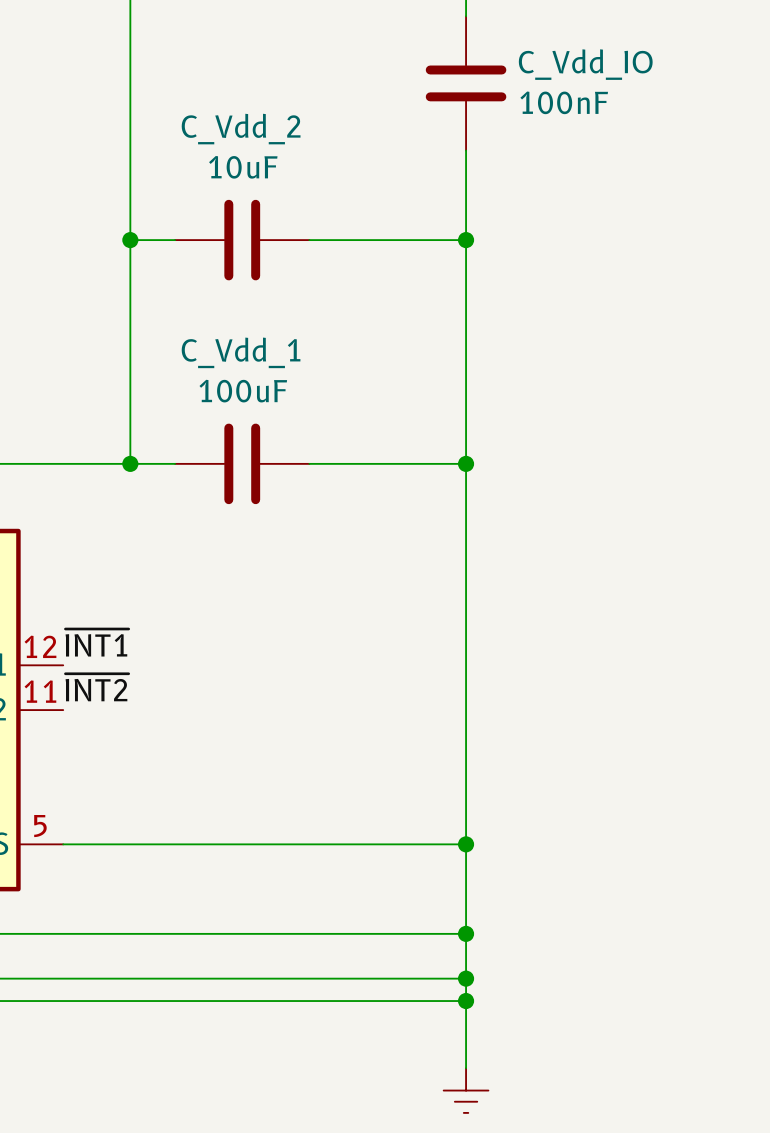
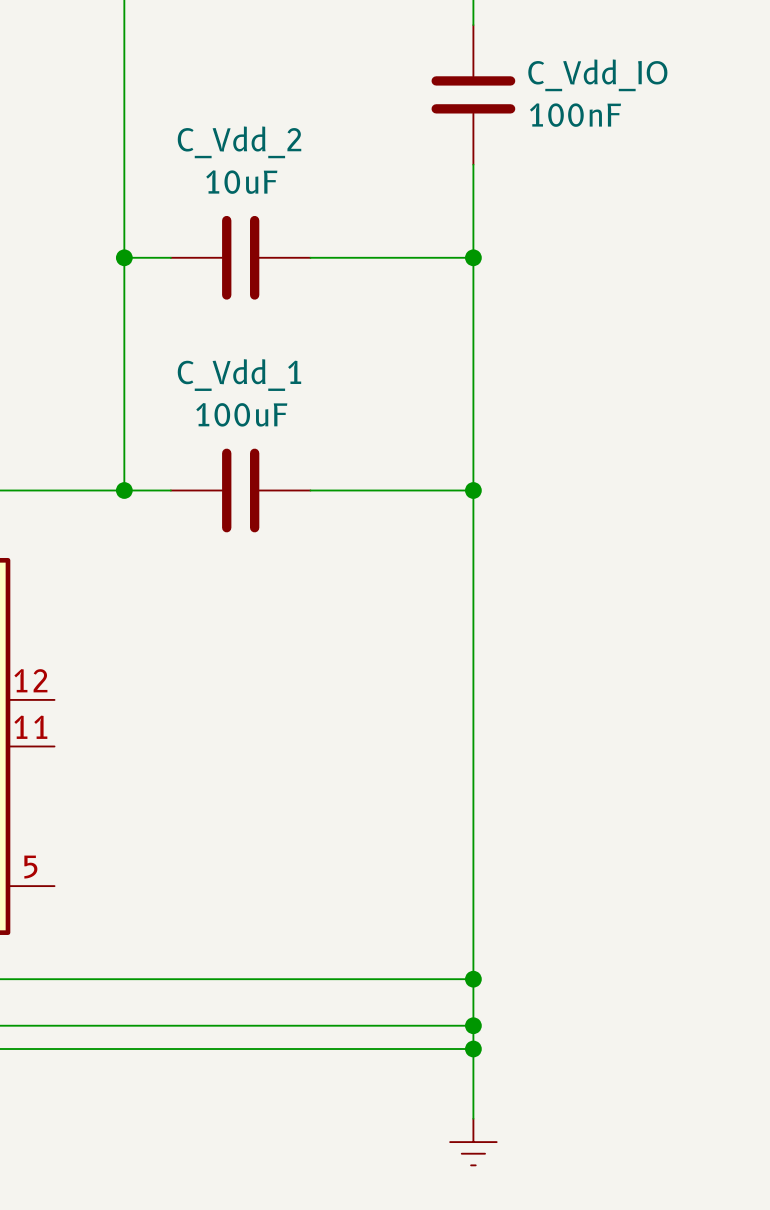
label: ~{INT1} (97, 642) -> none
label: ~{INT2} (97, 687) -> none
wire: (63, 844) (466, 844) -> none
junction: (466, 844) -> none

